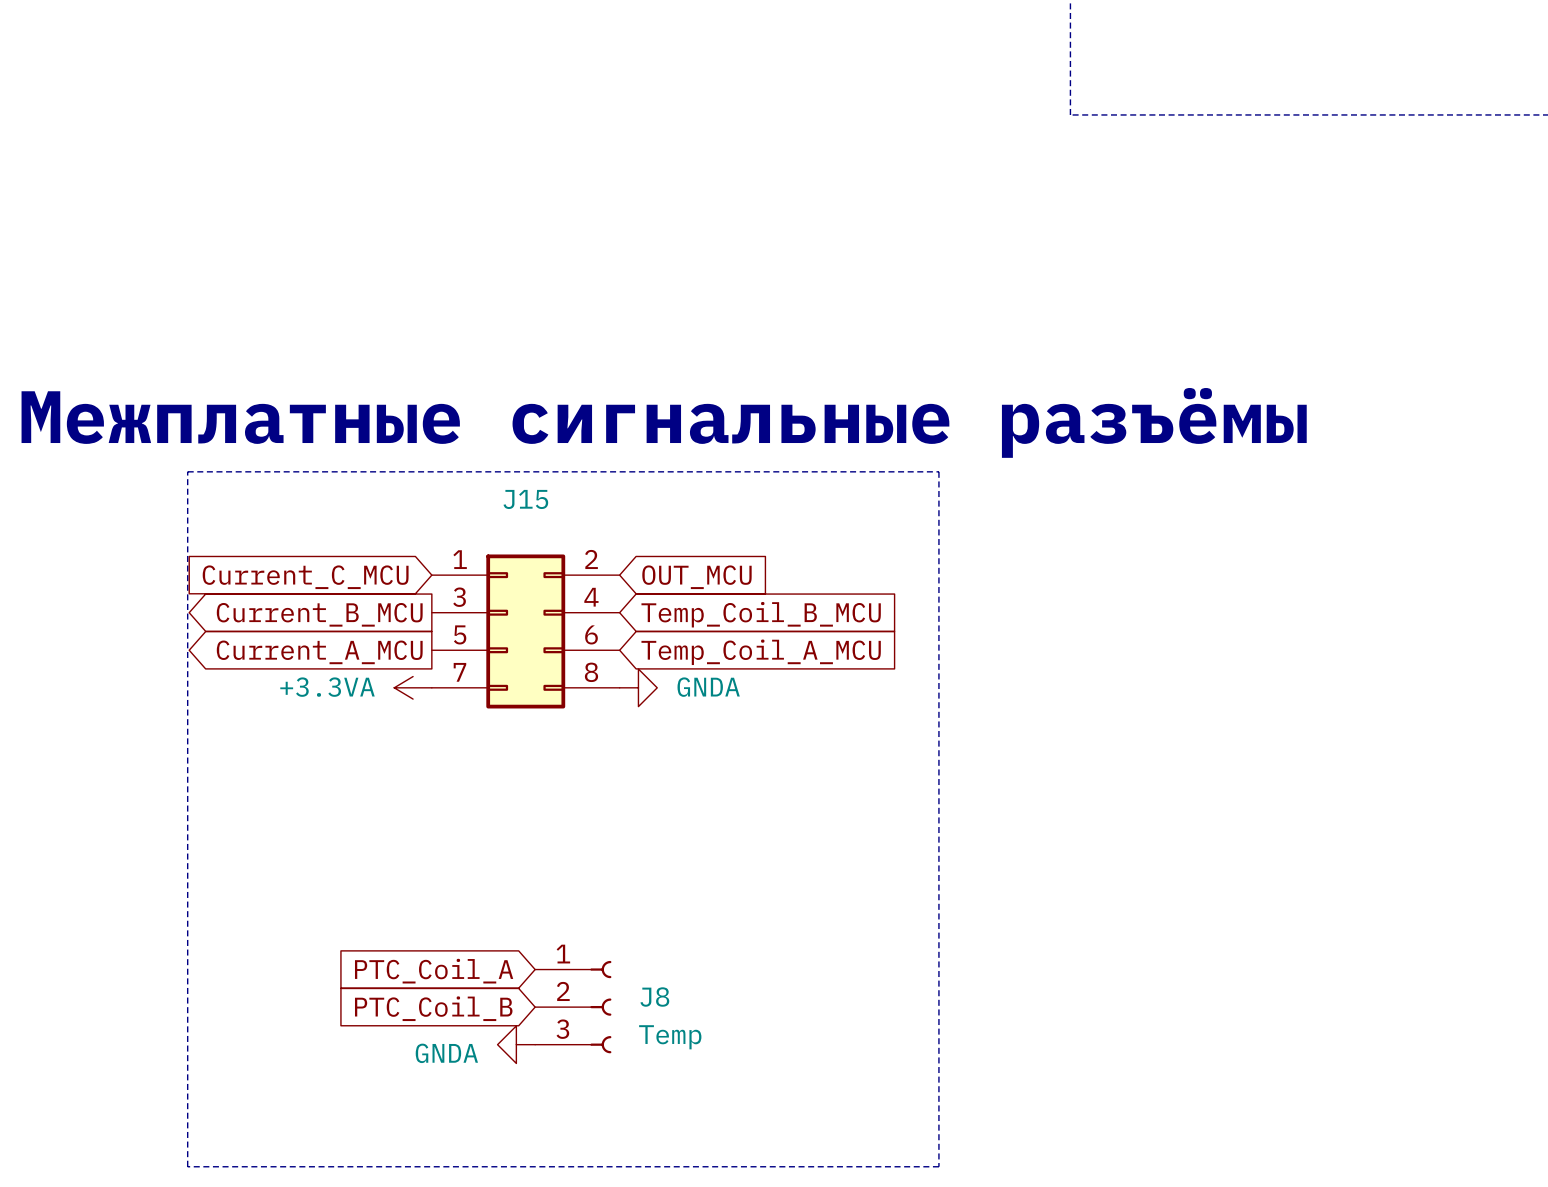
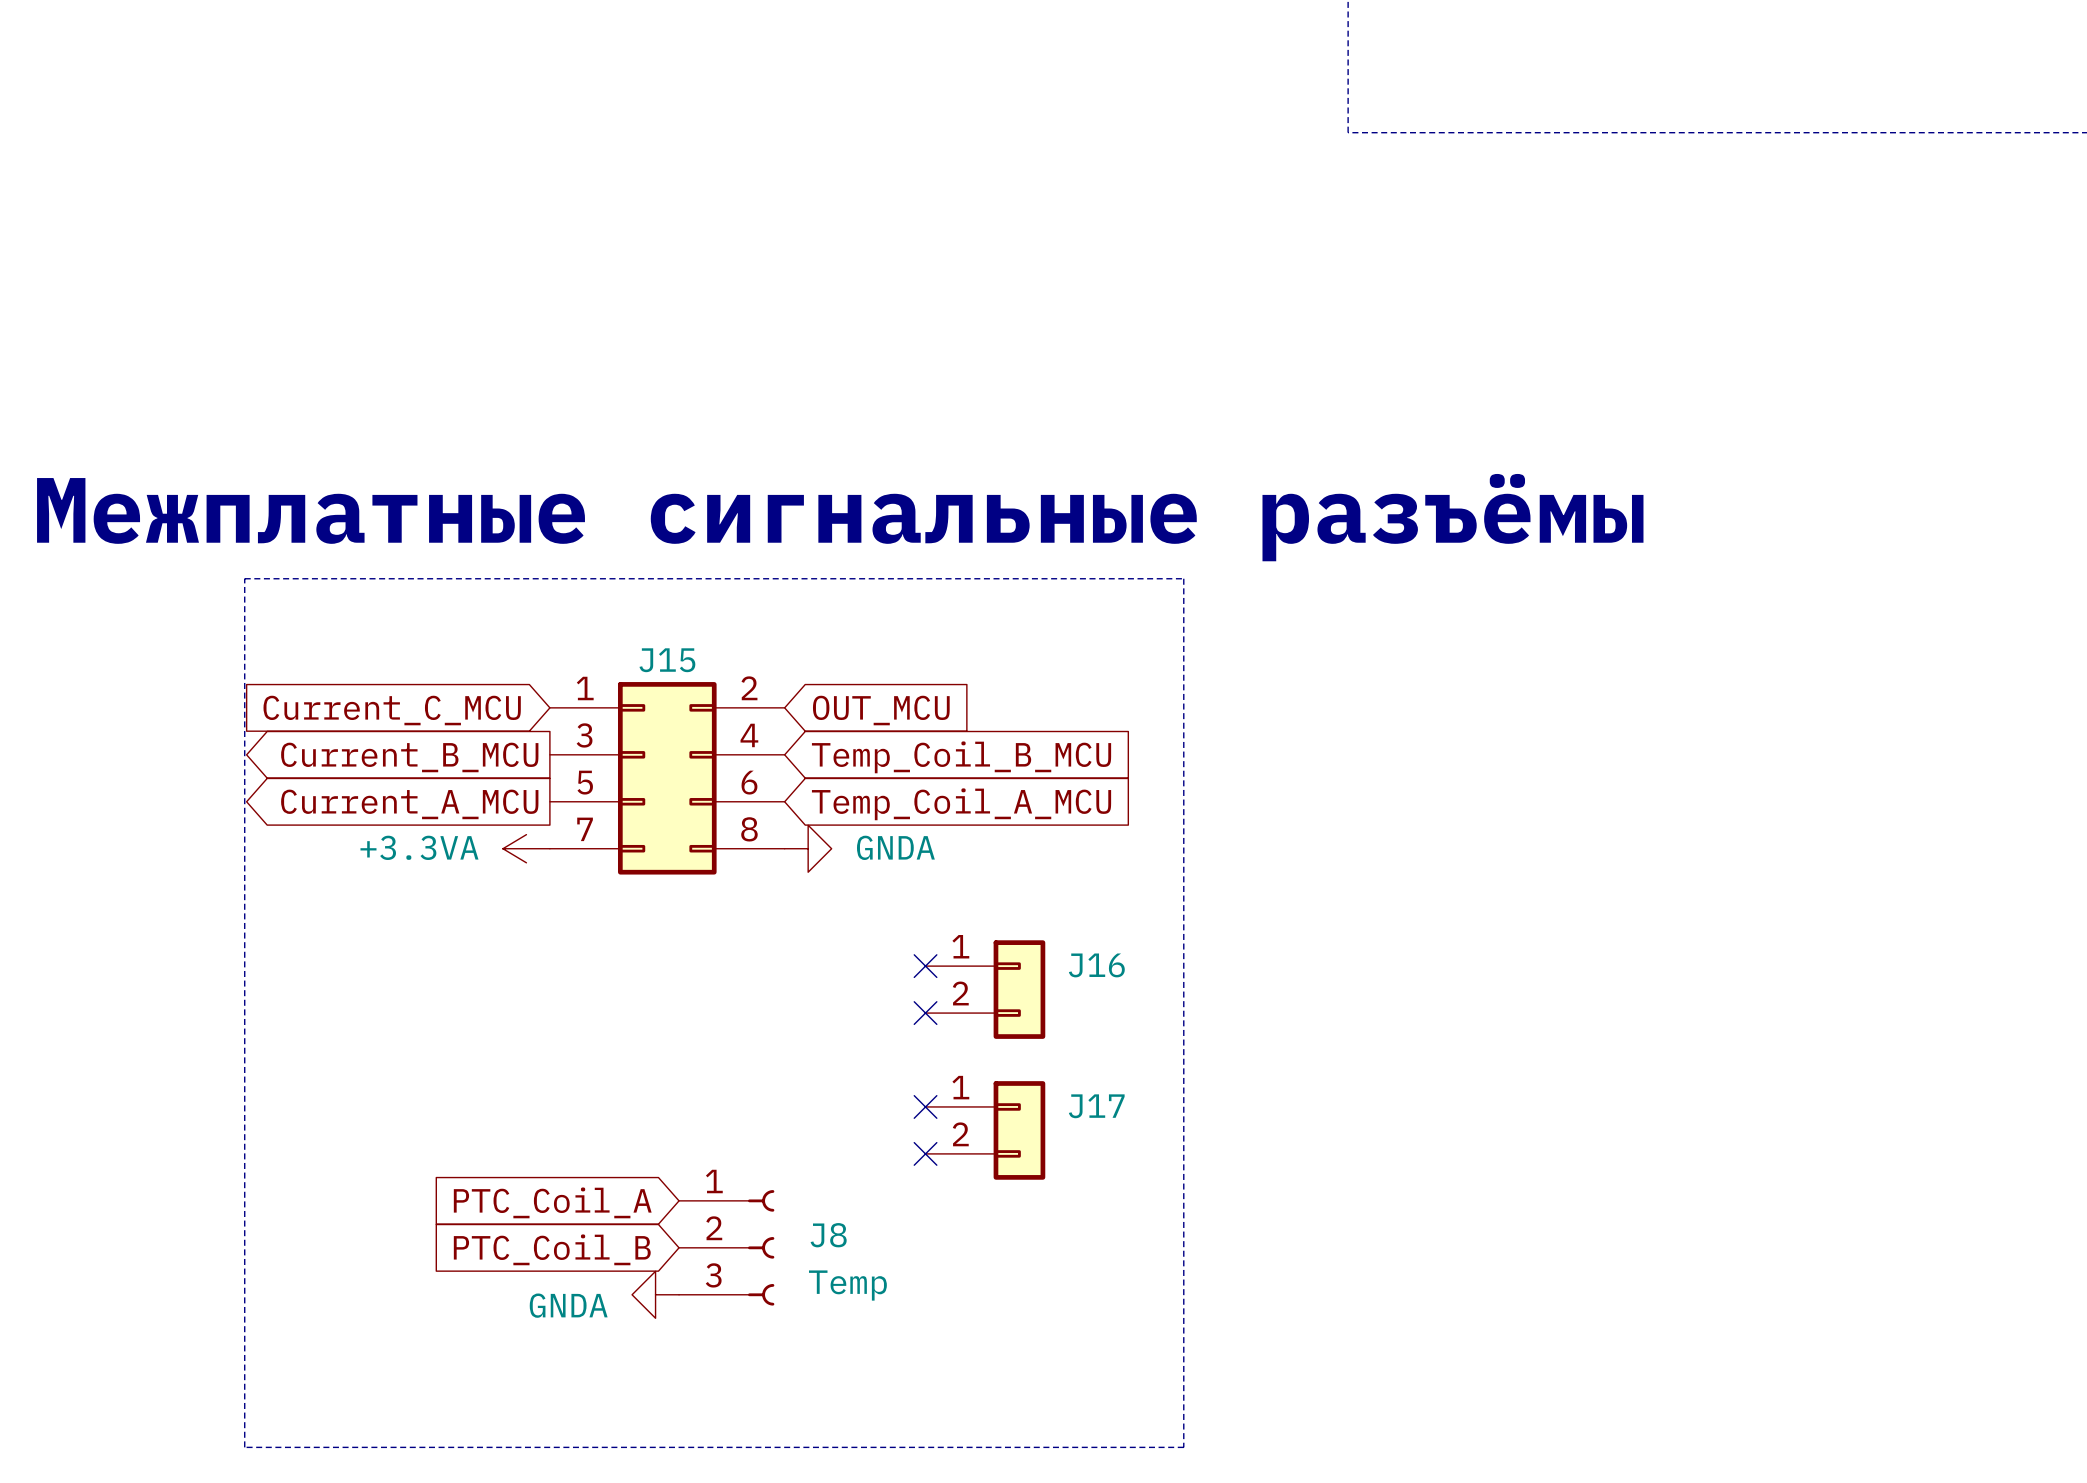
J15 name position: J15 (525, 499) -> J15 (667, 660)
no-connect mark: none -> (925, 966)
J16: none -> (985, 989)
no-connect mark: none -> (925, 1013)
no-connect mark: none -> (925, 1106)
J17: none -> (985, 1130)
no-connect mark: none -> (925, 1153)

